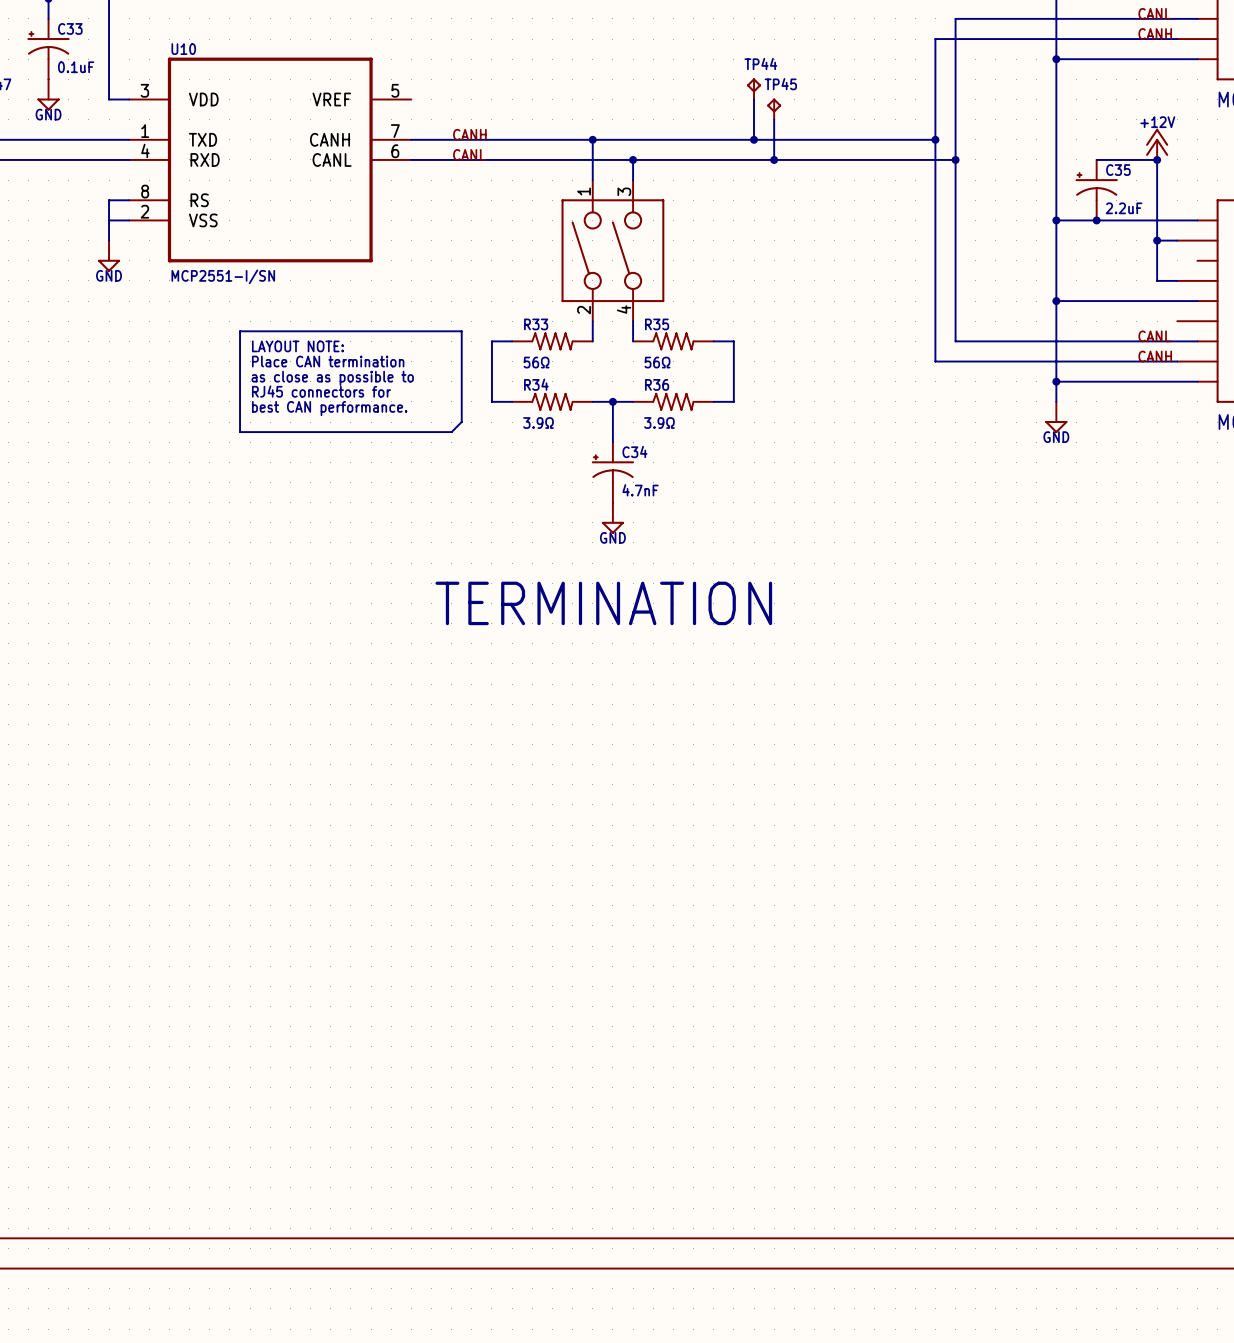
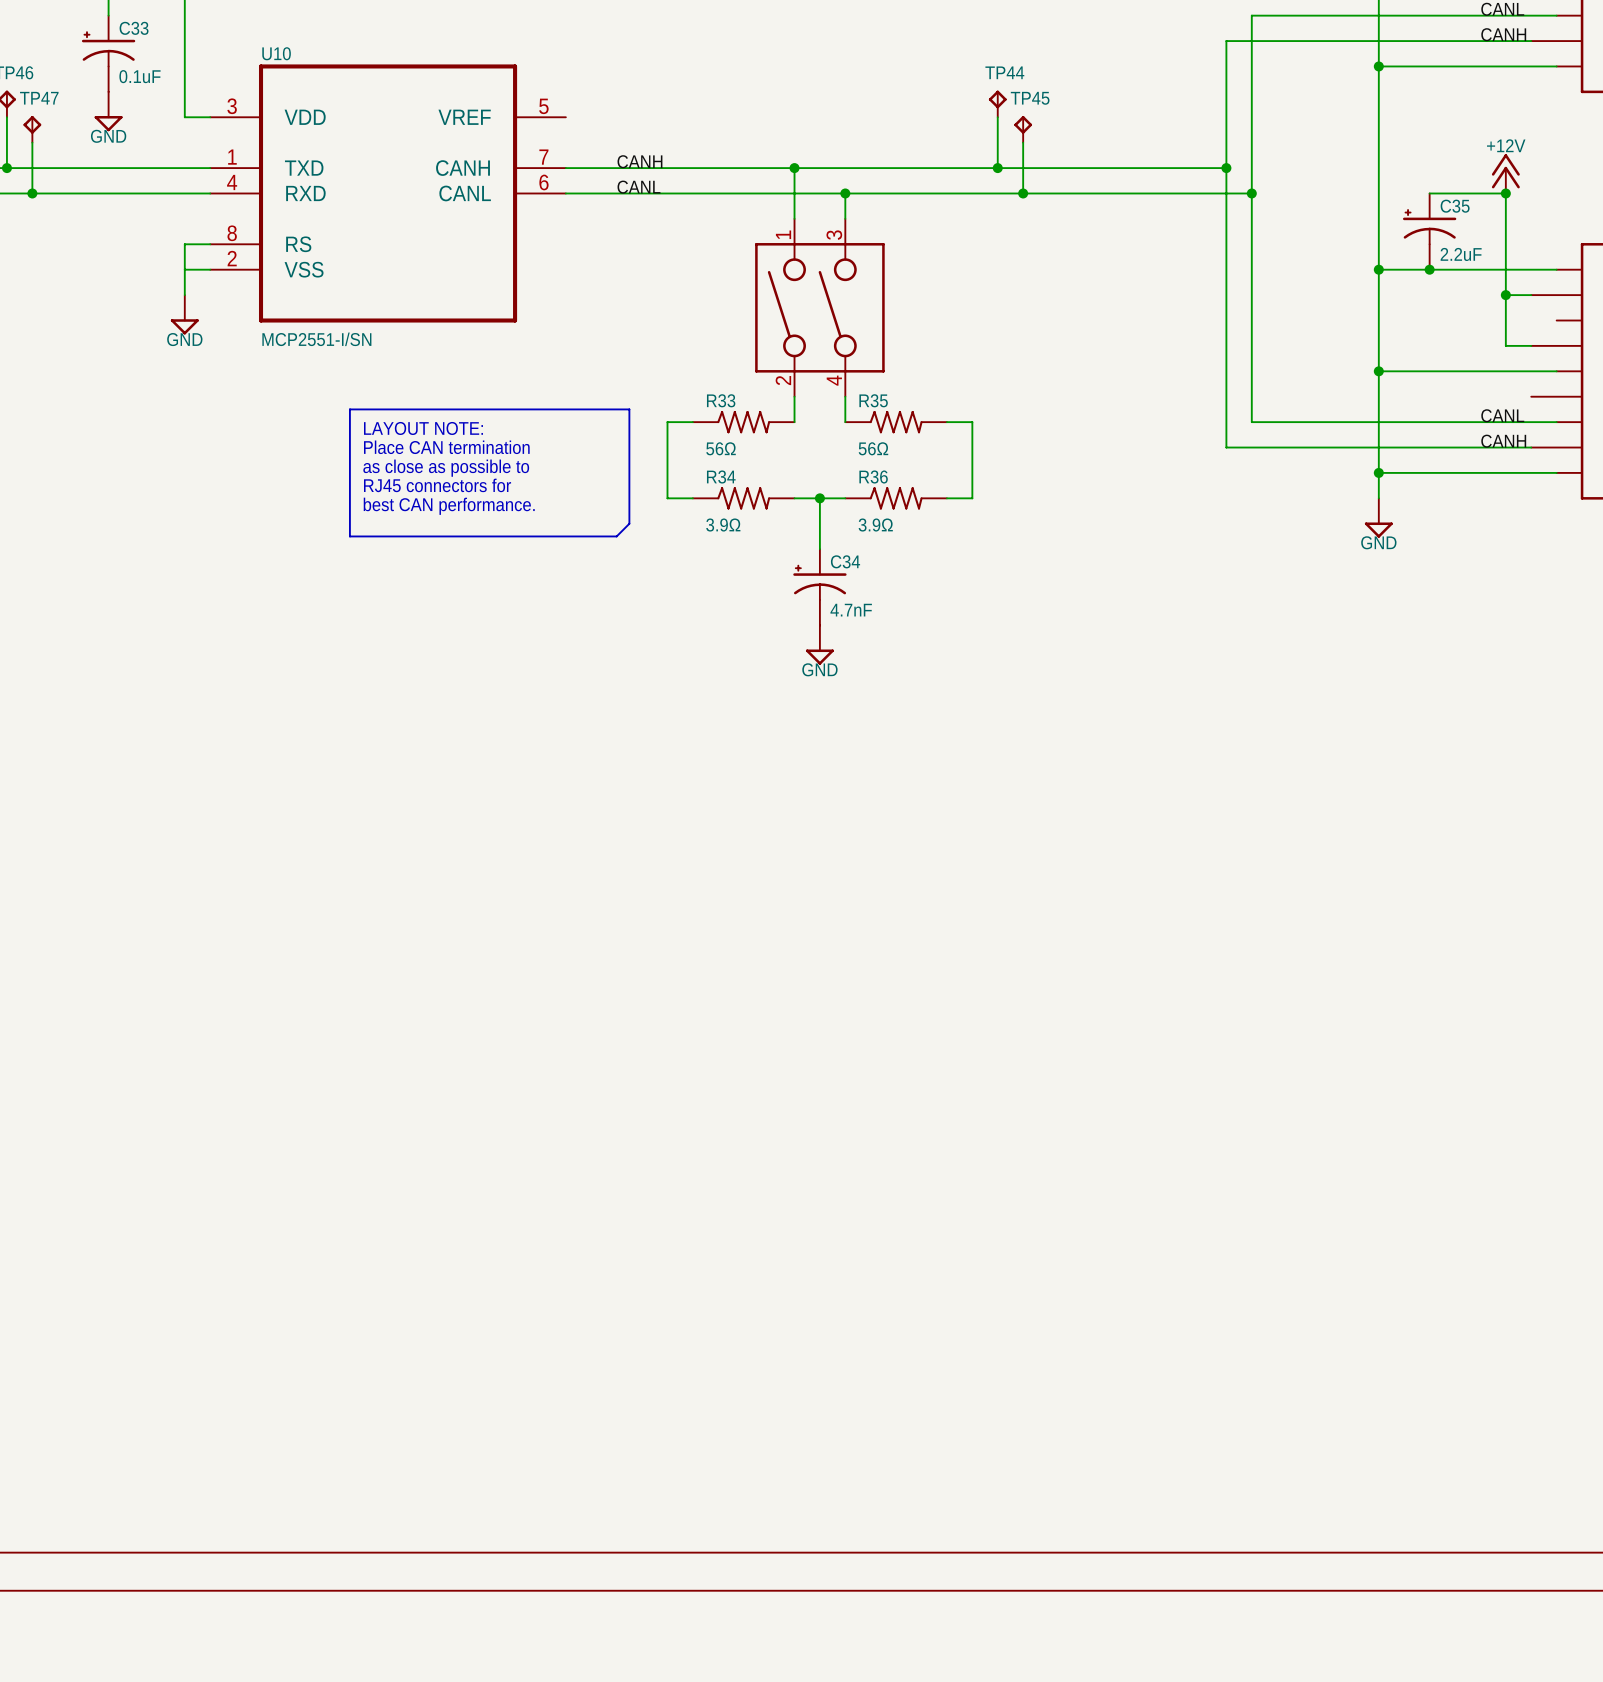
text: TERMINATION (603, 603) -> none

